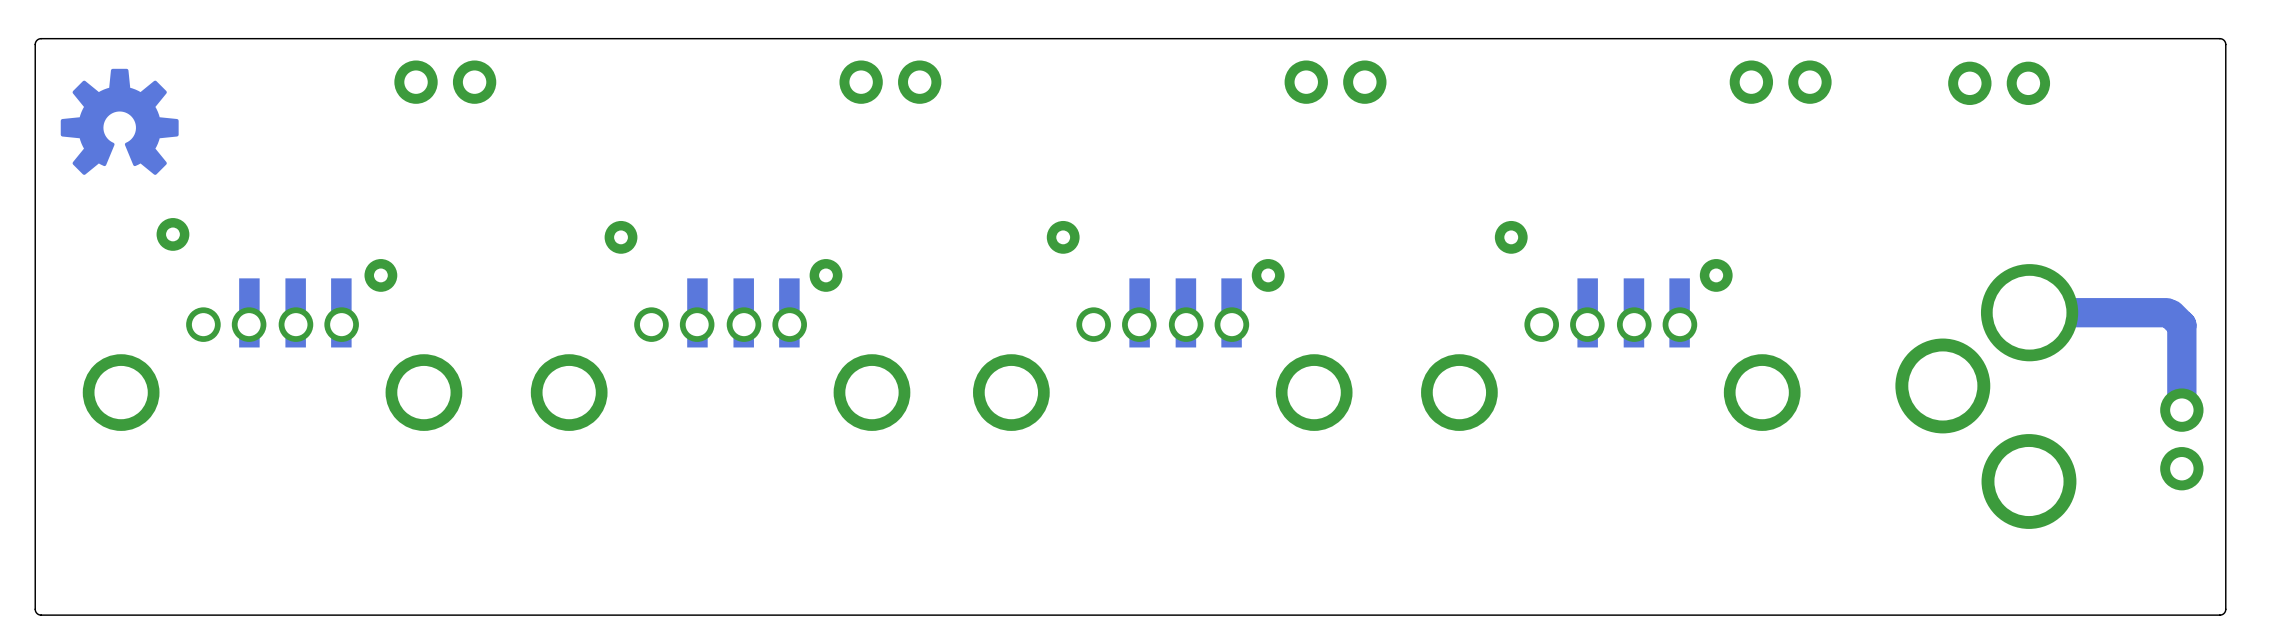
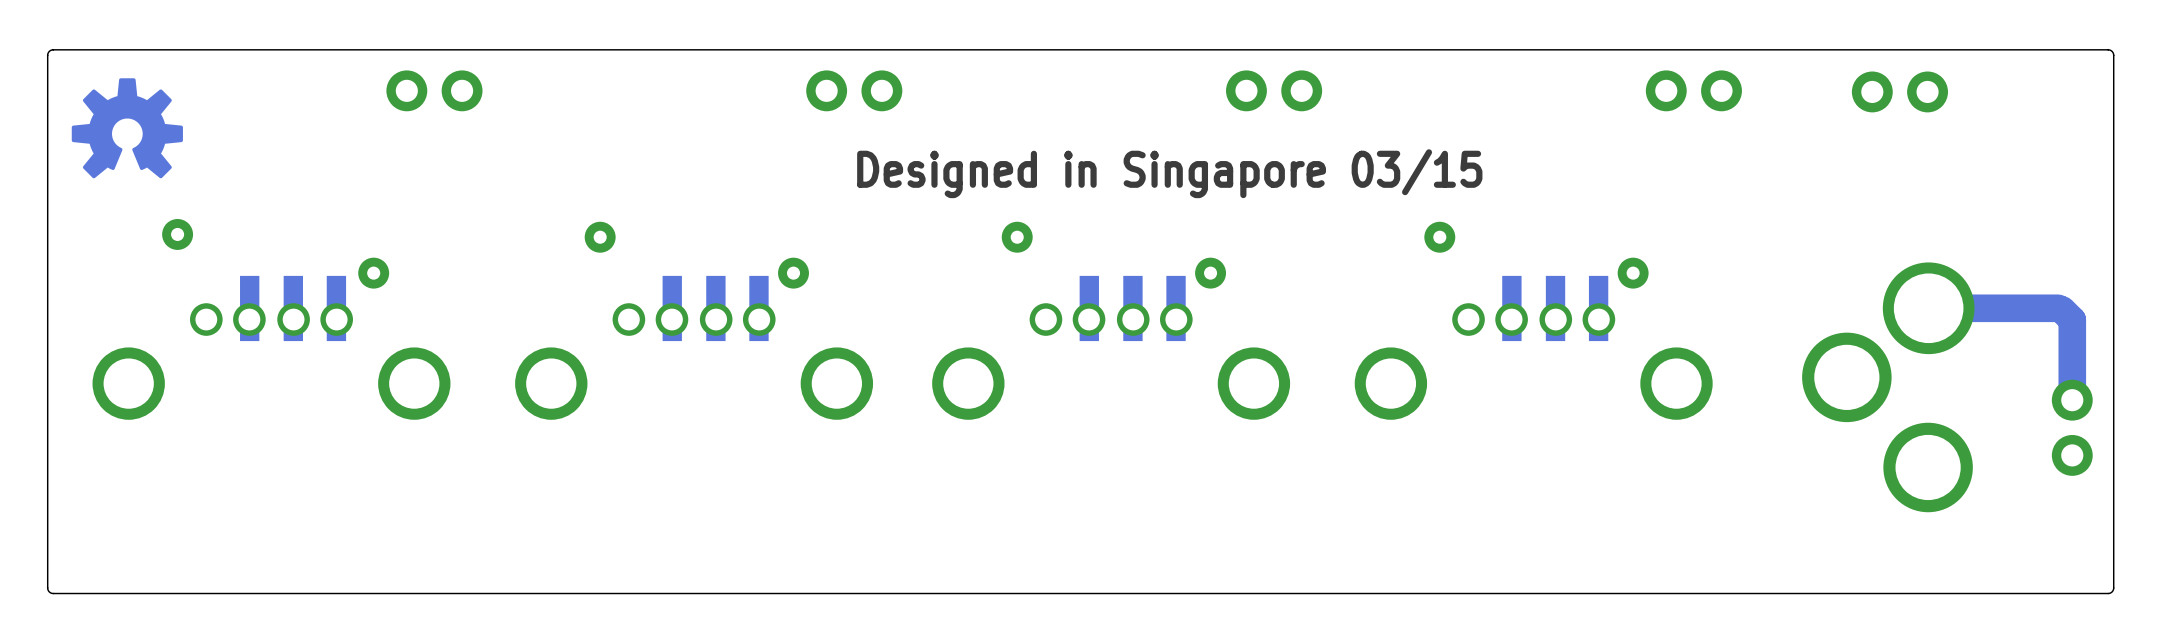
text: none -> Designed in Singapore 03/15 (1169, 173)

